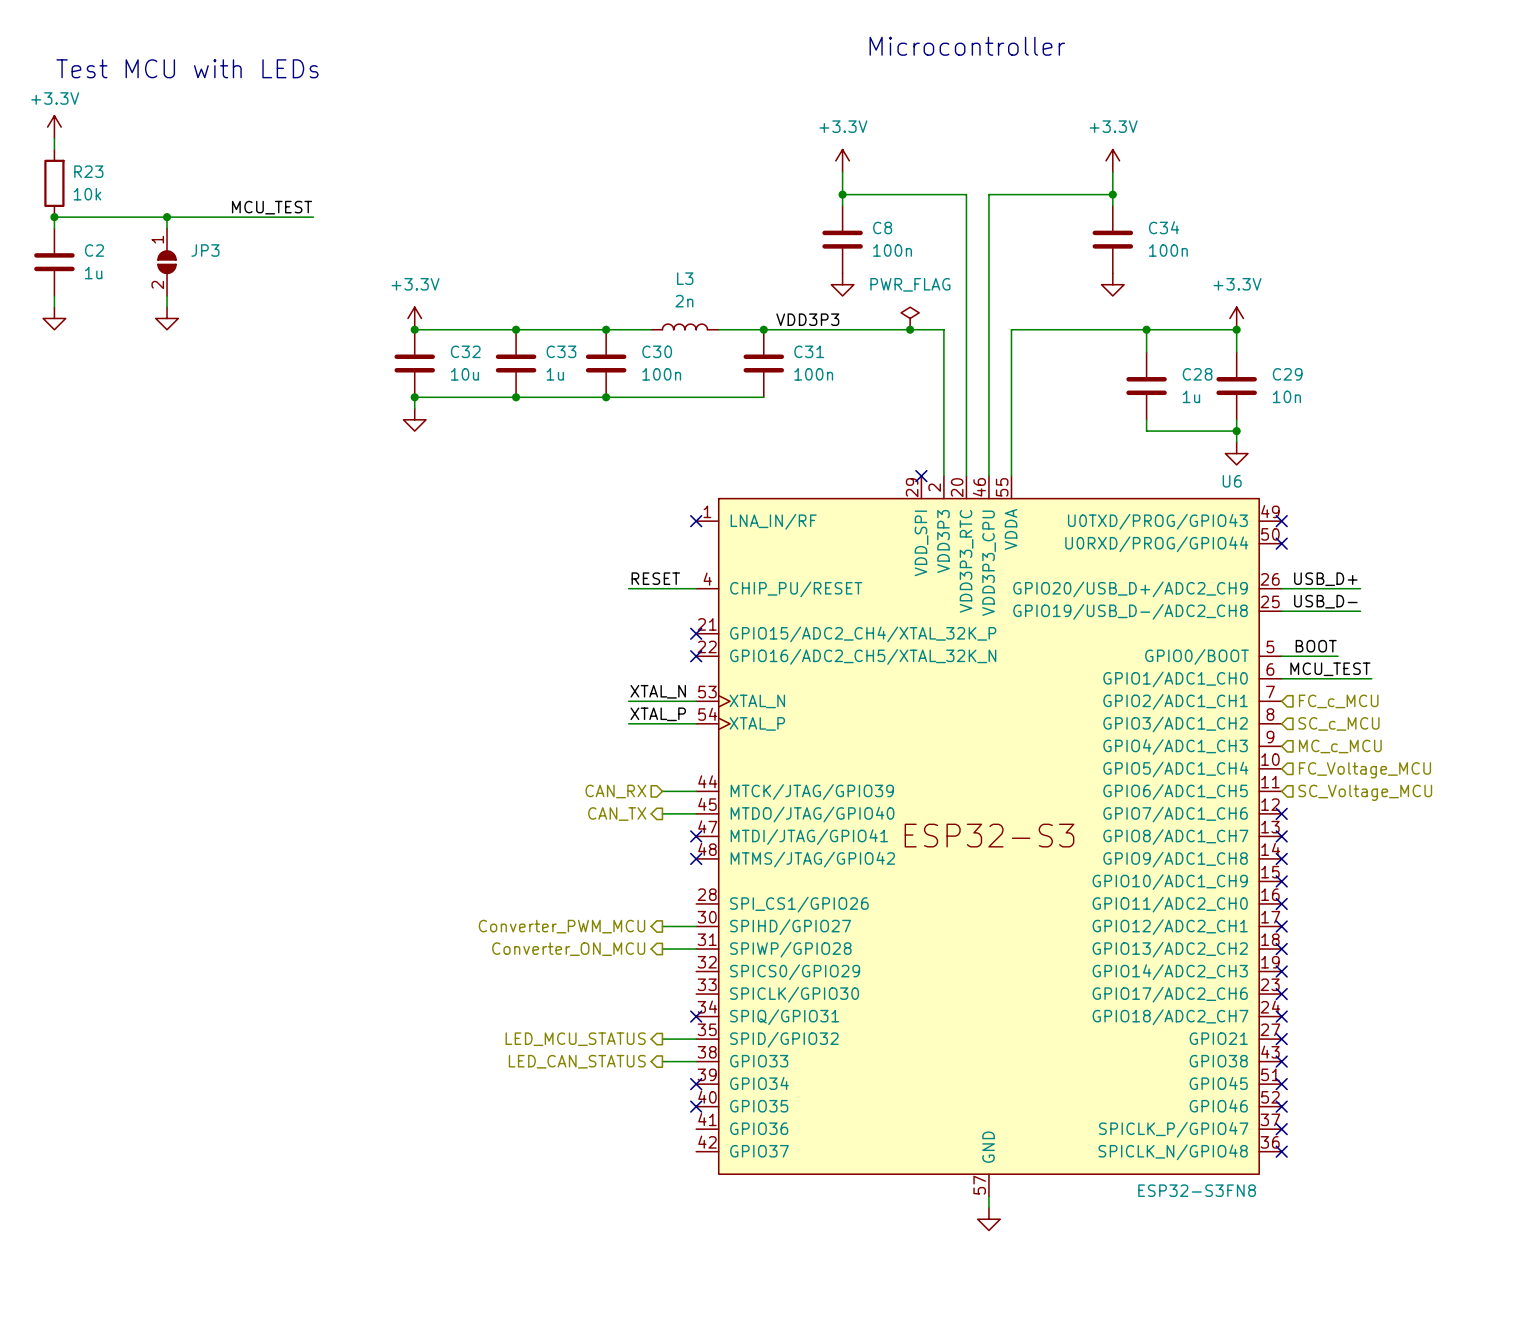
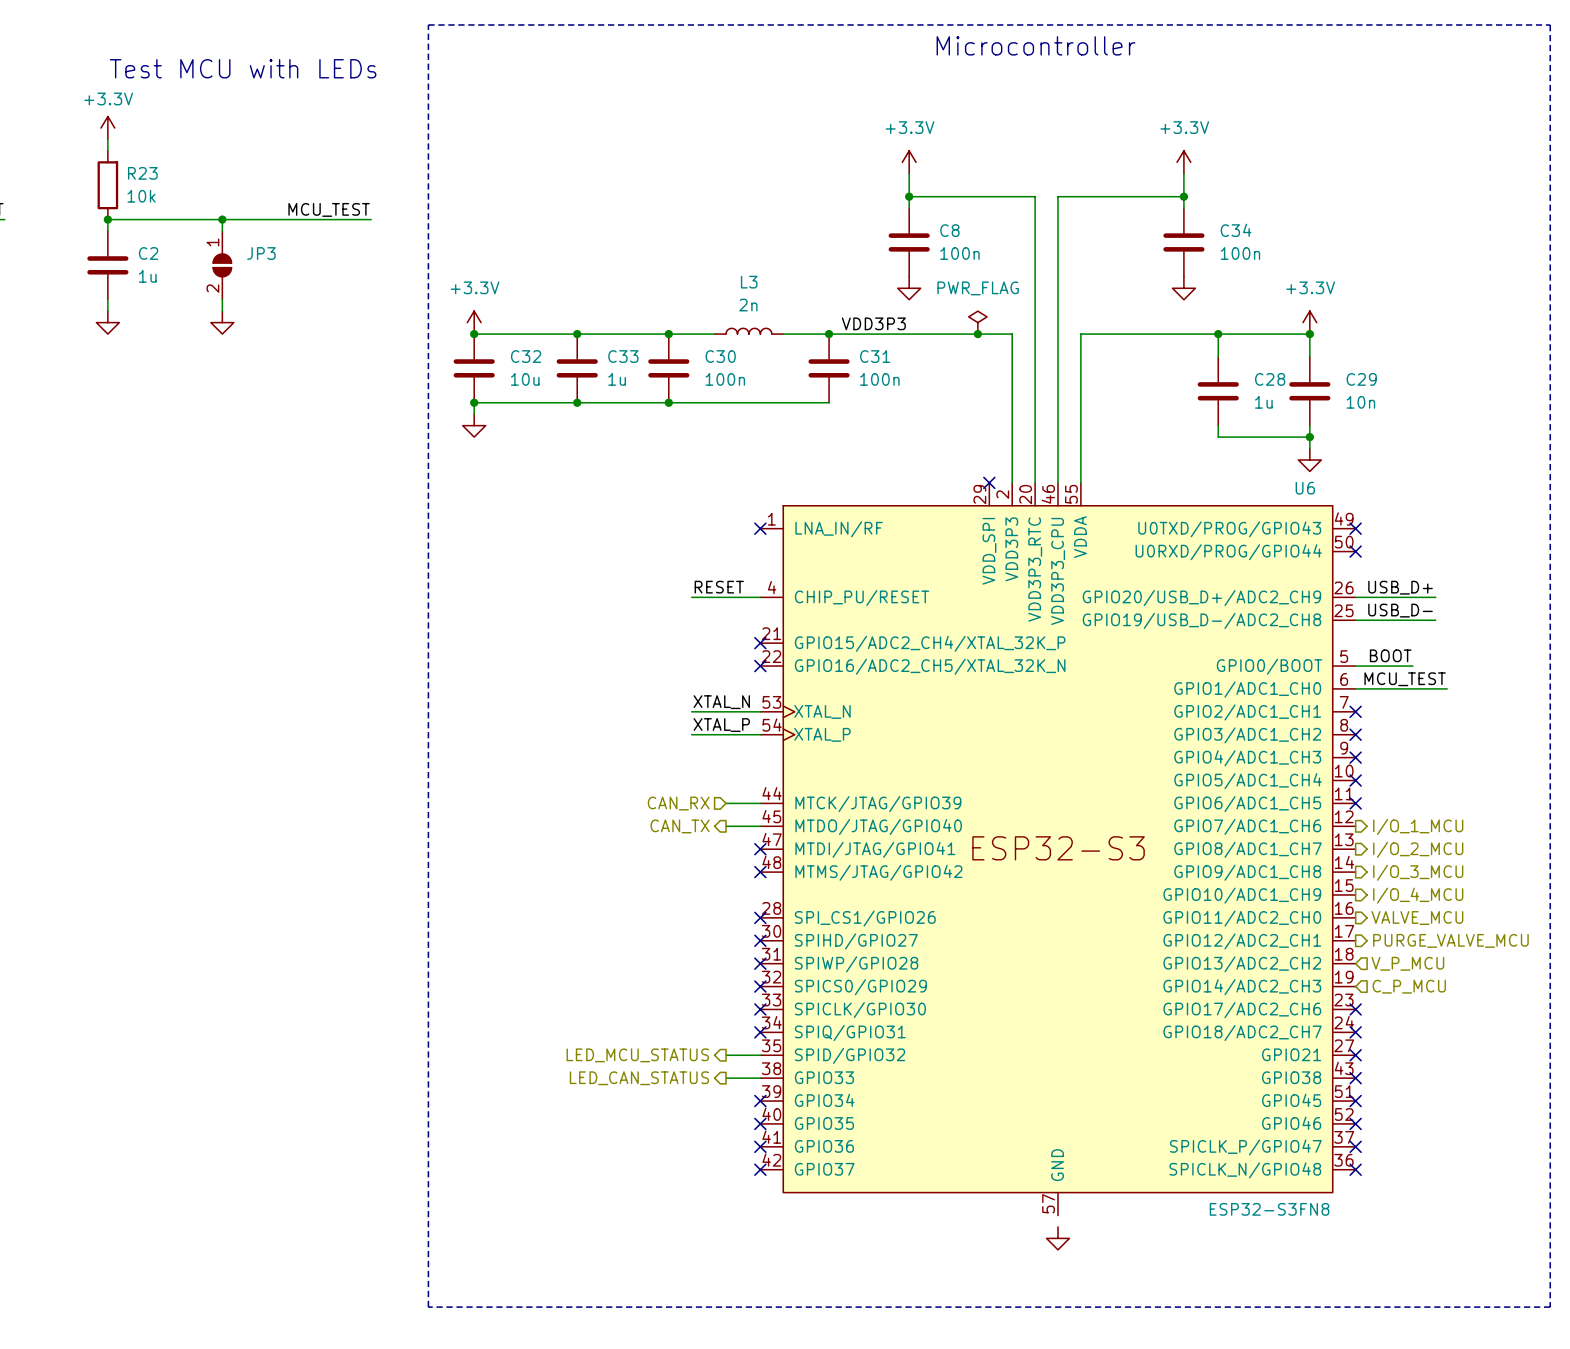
line: none -> (428, 24) (1550, 24) (1550, 1307) (428, 1307) (428, 24)
no-connect mark: none -> (1355, 711)
hierarchical label: FC_c_MCU (1338, 701) -> none
no-connect mark: none -> (1355, 734)
hierarchical label: SC_c_MCU (1338, 723) -> none
no-connect mark: none -> (1355, 757)
hierarchical label: MC_c_MCU (1340, 746) -> none
no-connect mark: none -> (1355, 780)
hierarchical label: FC_Voltage_MCU (1364, 770) -> none
no-connect mark: none -> (1355, 803)
hierarchical label: SC_Voltage_MCU (1365, 792) -> none
no-connect mark: (1281, 813) -> none
hierarchical label: none -> I/O_1_MCU (1418, 826)
no-connect mark: (1281, 836) -> none
hierarchical label: none -> I/O_2_MCU (1418, 849)
no-connect mark: (1281, 858) -> none
hierarchical label: none -> I/O_3_MCU (1418, 872)
no-connect mark: (1281, 881) -> none
hierarchical label: none -> I/O_4_MCU (1418, 895)
no-connect mark: none -> (760, 917)
no-connect mark: (1281, 903) -> none
hierarchical label: none -> VALVE_MCU (1417, 917)
hierarchical label: Converter_PWM_MCU (561, 926) -> none
wire: (662, 926) (696, 926) -> none
no-connect mark: none -> (760, 940)
no-connect mark: (1281, 926) -> none
hierarchical label: none -> PURGE_VALVE_MCU (1450, 940)
hierarchical label: Converter_ON_MCU (568, 949) -> none
wire: (662, 949) (696, 949) -> none
no-connect mark: none -> (760, 963)
no-connect mark: (1281, 949) -> none
hierarchical label: none -> V_P_MCU (1407, 963)
no-connect mark: none -> (760, 986)
no-connect mark: (1281, 971) -> none
hierarchical label: none -> C_P_MCU (1409, 986)
no-connect mark: none -> (760, 1009)
no-connect mark: none -> (760, 1146)
no-connect mark: none -> (760, 1169)
wire: (988, 1196) (988, 1207) -> none

